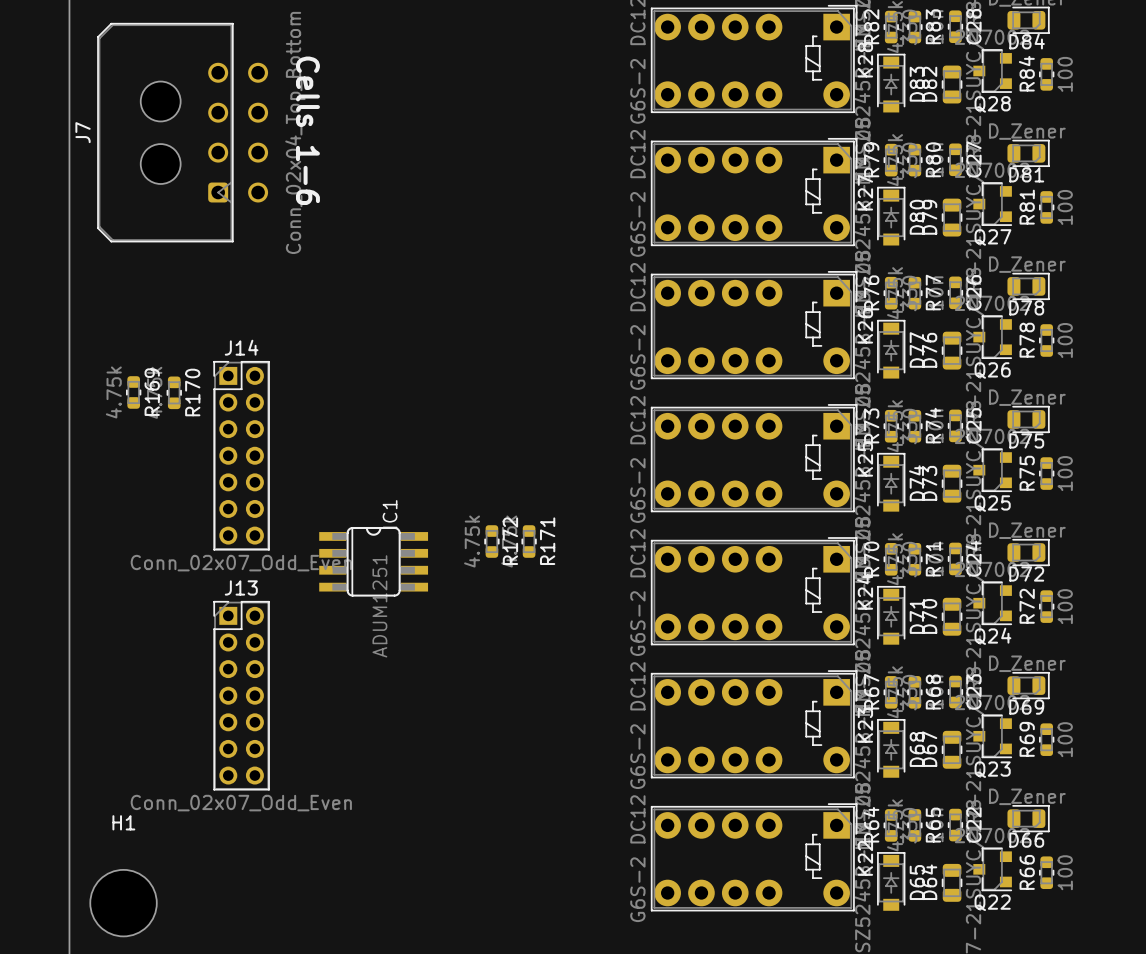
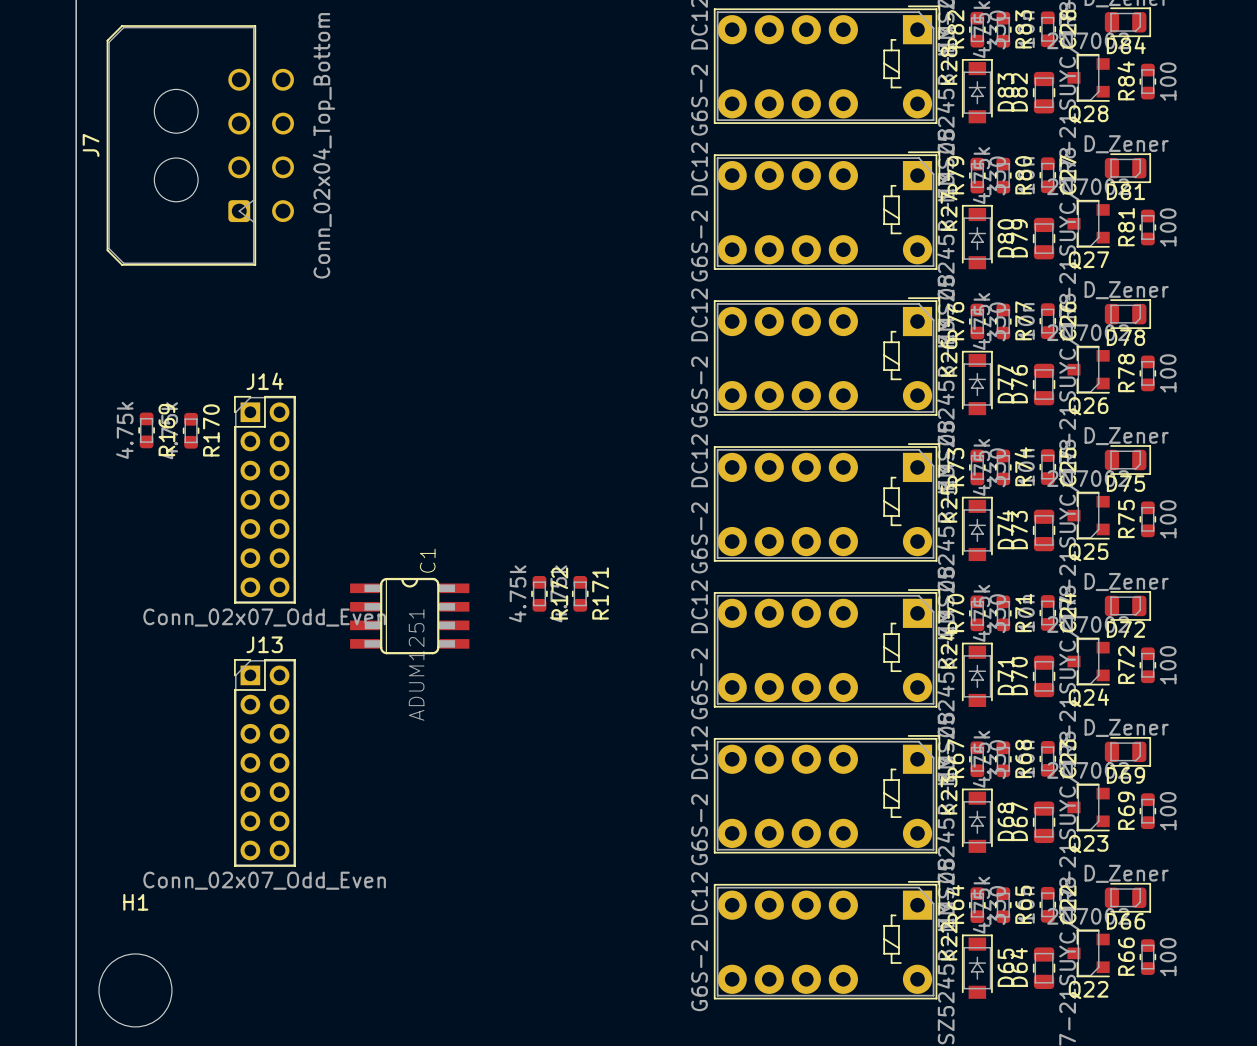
text: Cells 1-6 (307, 130) -> none

